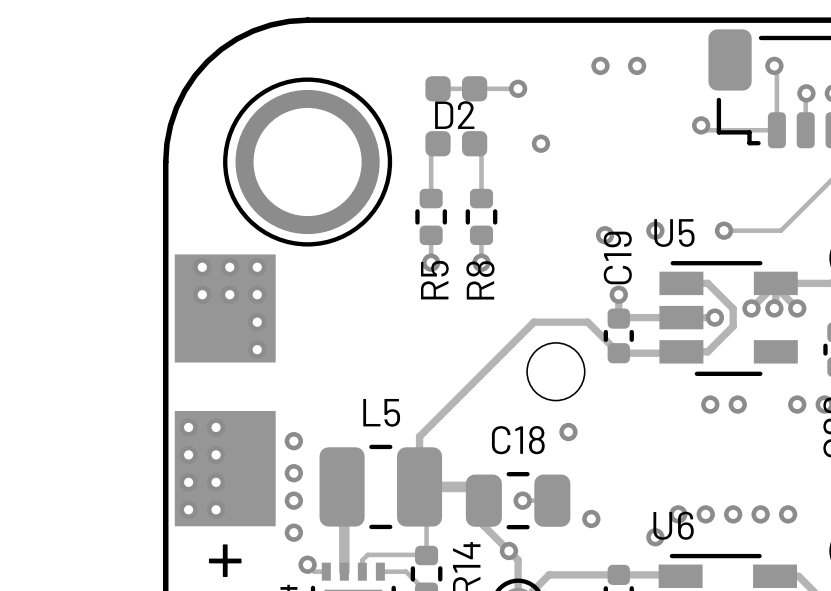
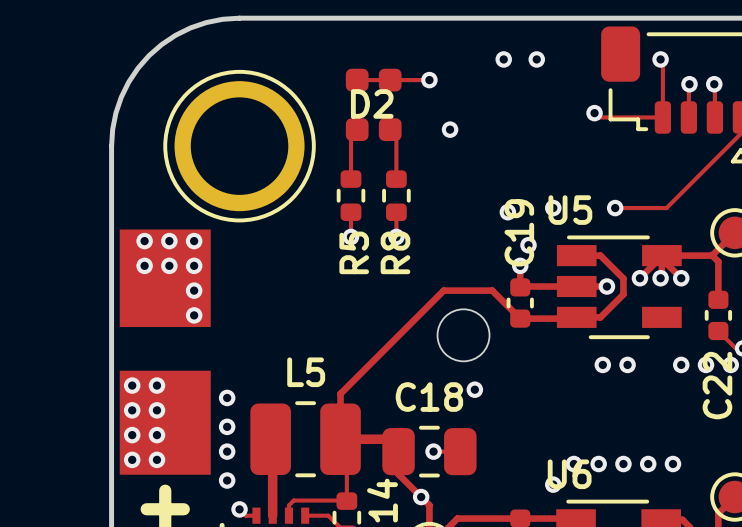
via: none -> (528, 245)
via: (591, 518) -> none

